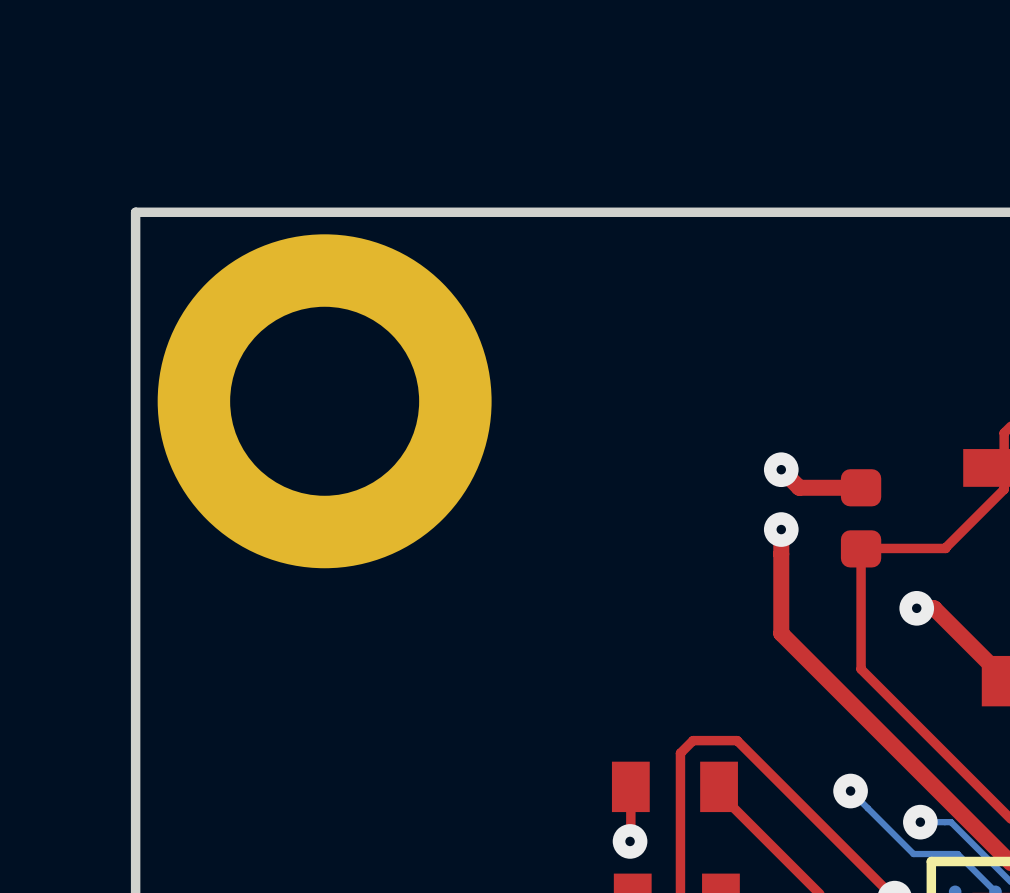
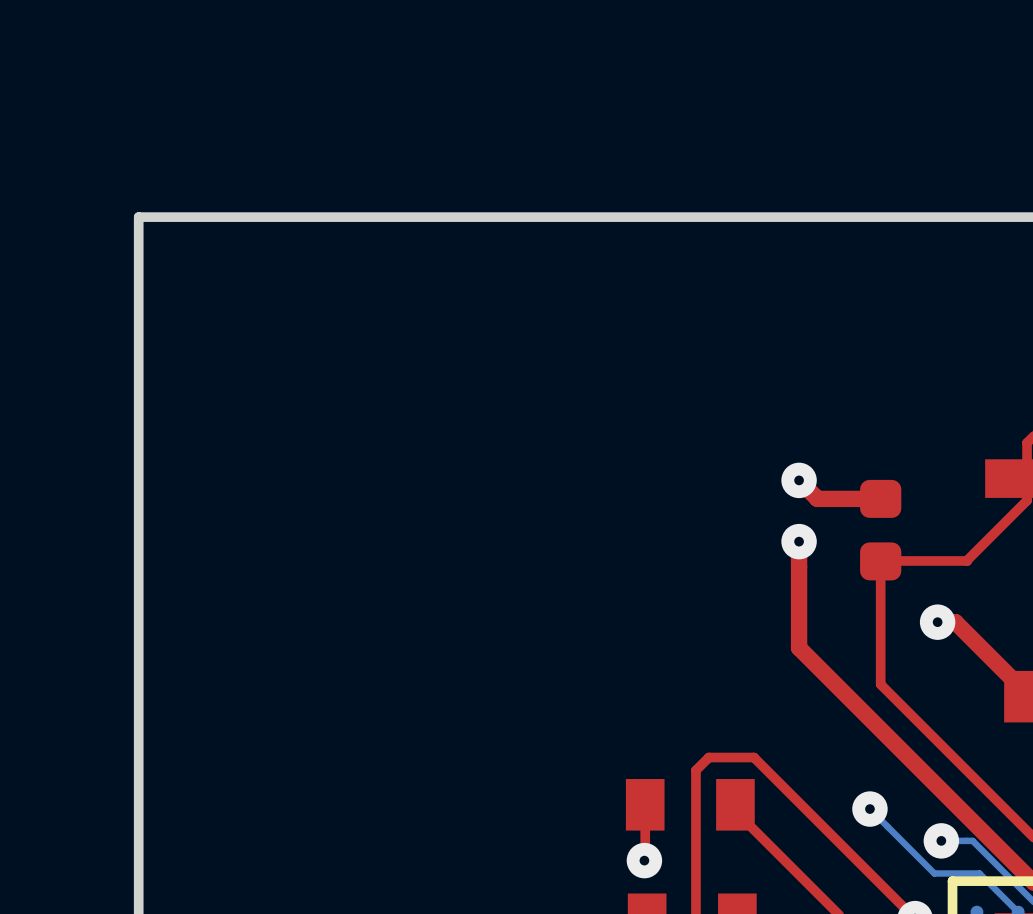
part: (324, 401) -> none

